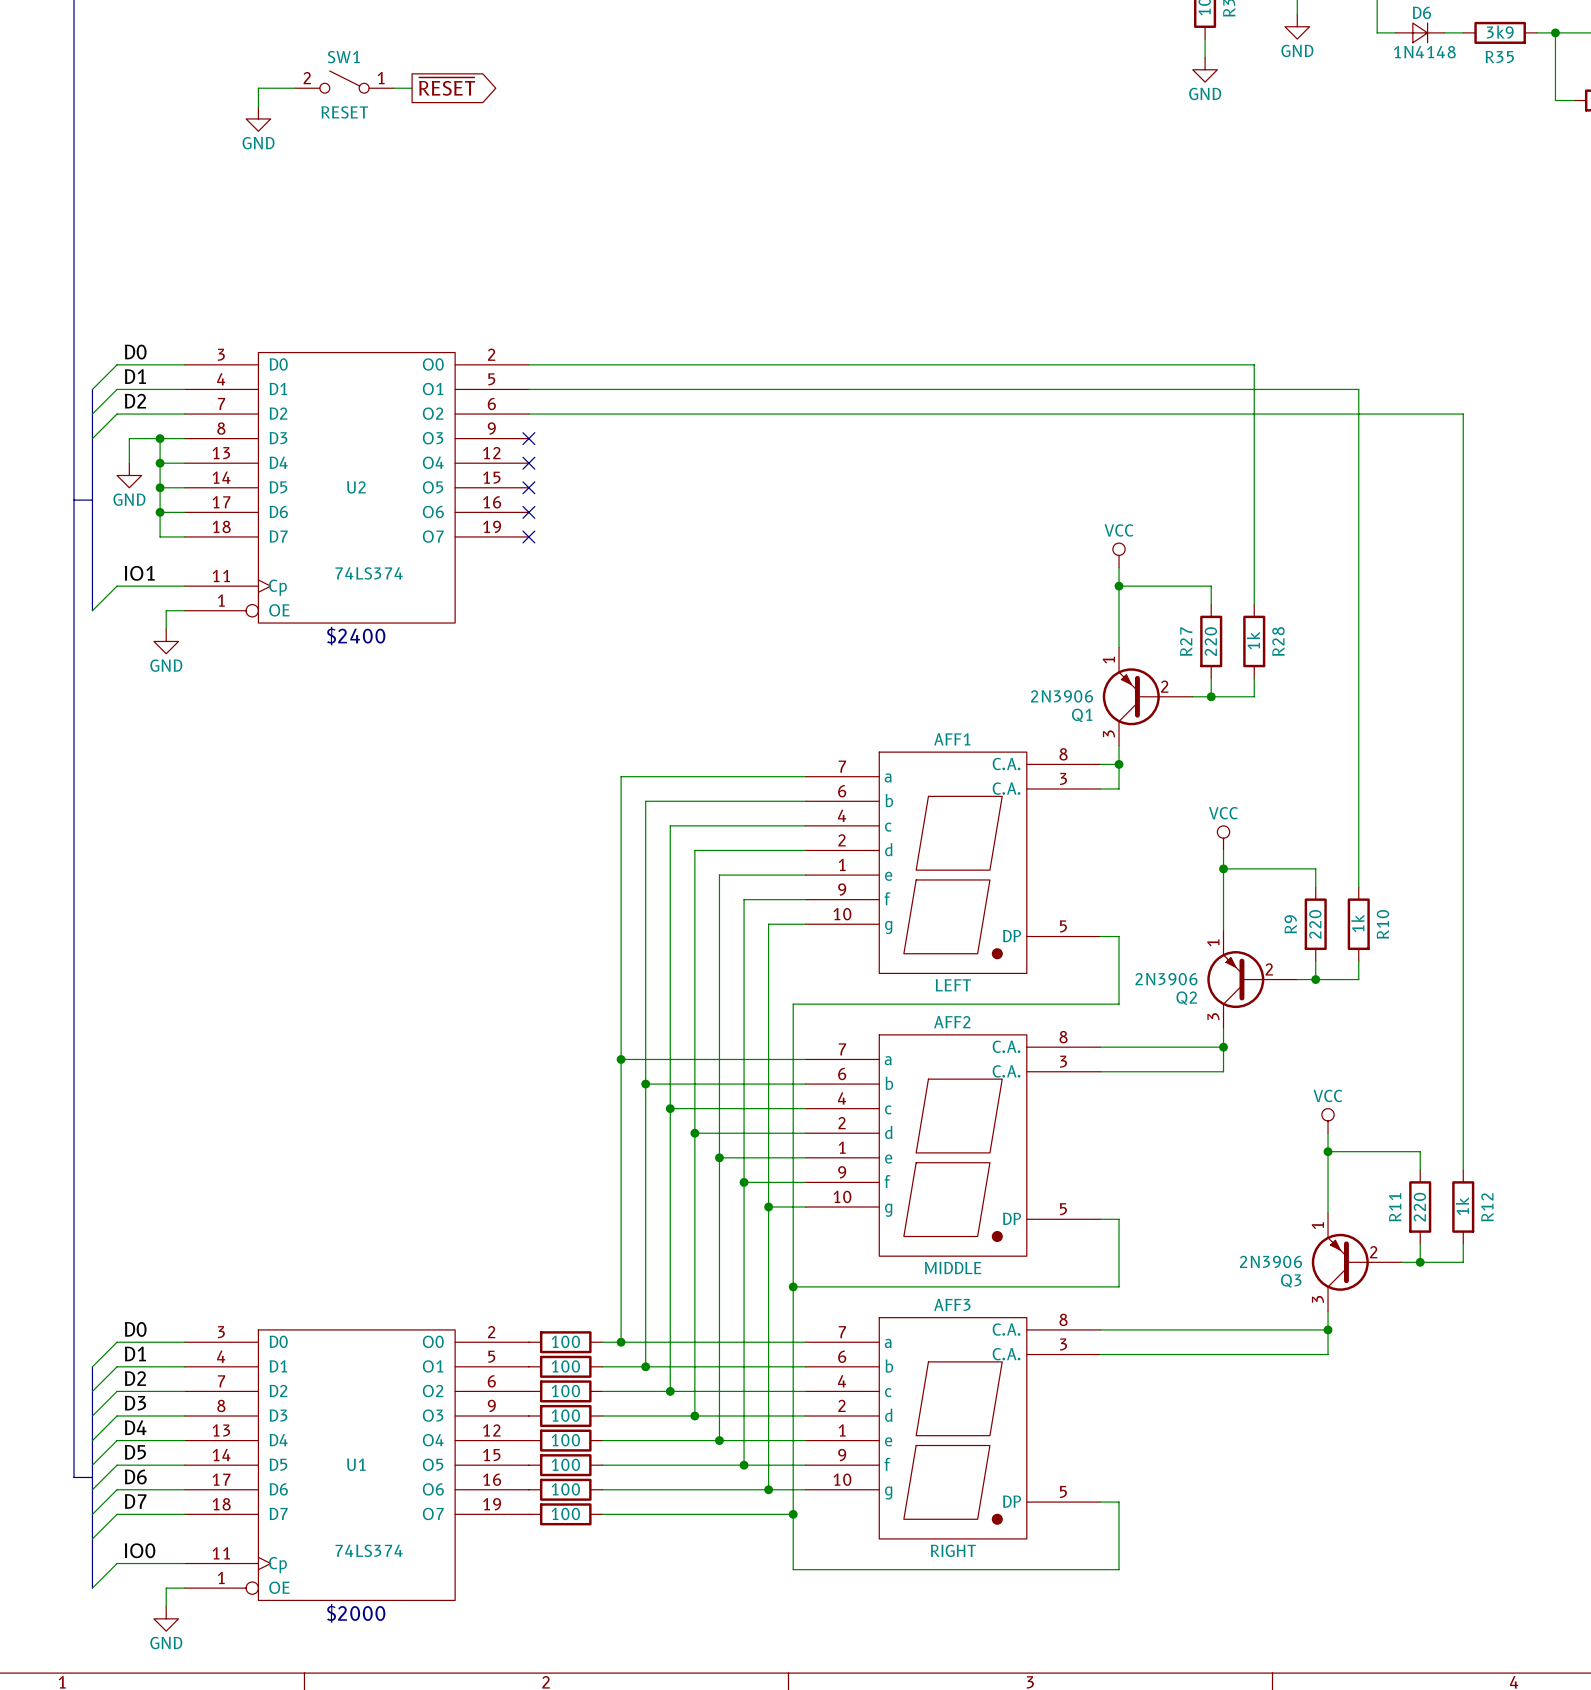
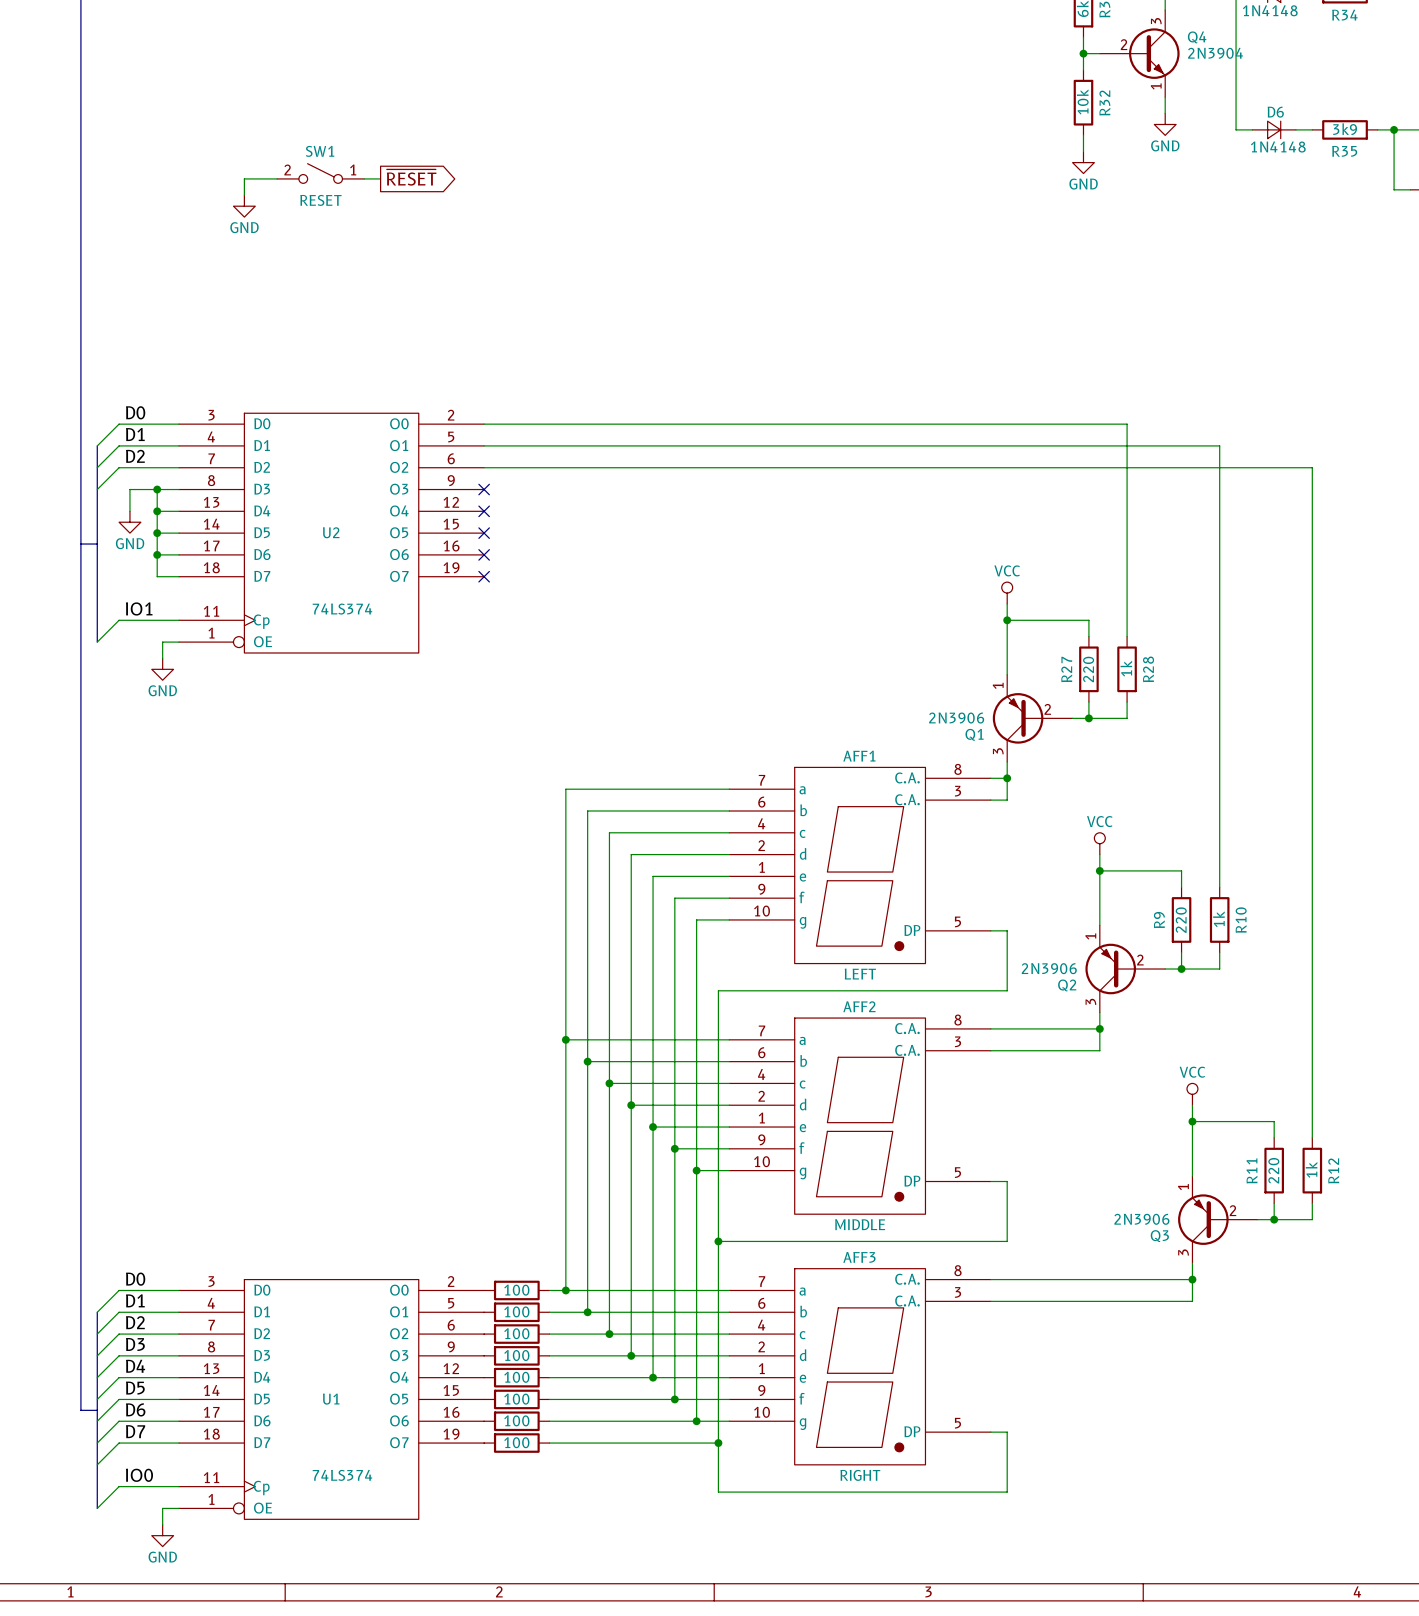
text: $2400 (356, 636) -> none
text: $2000 (356, 1613) -> none

